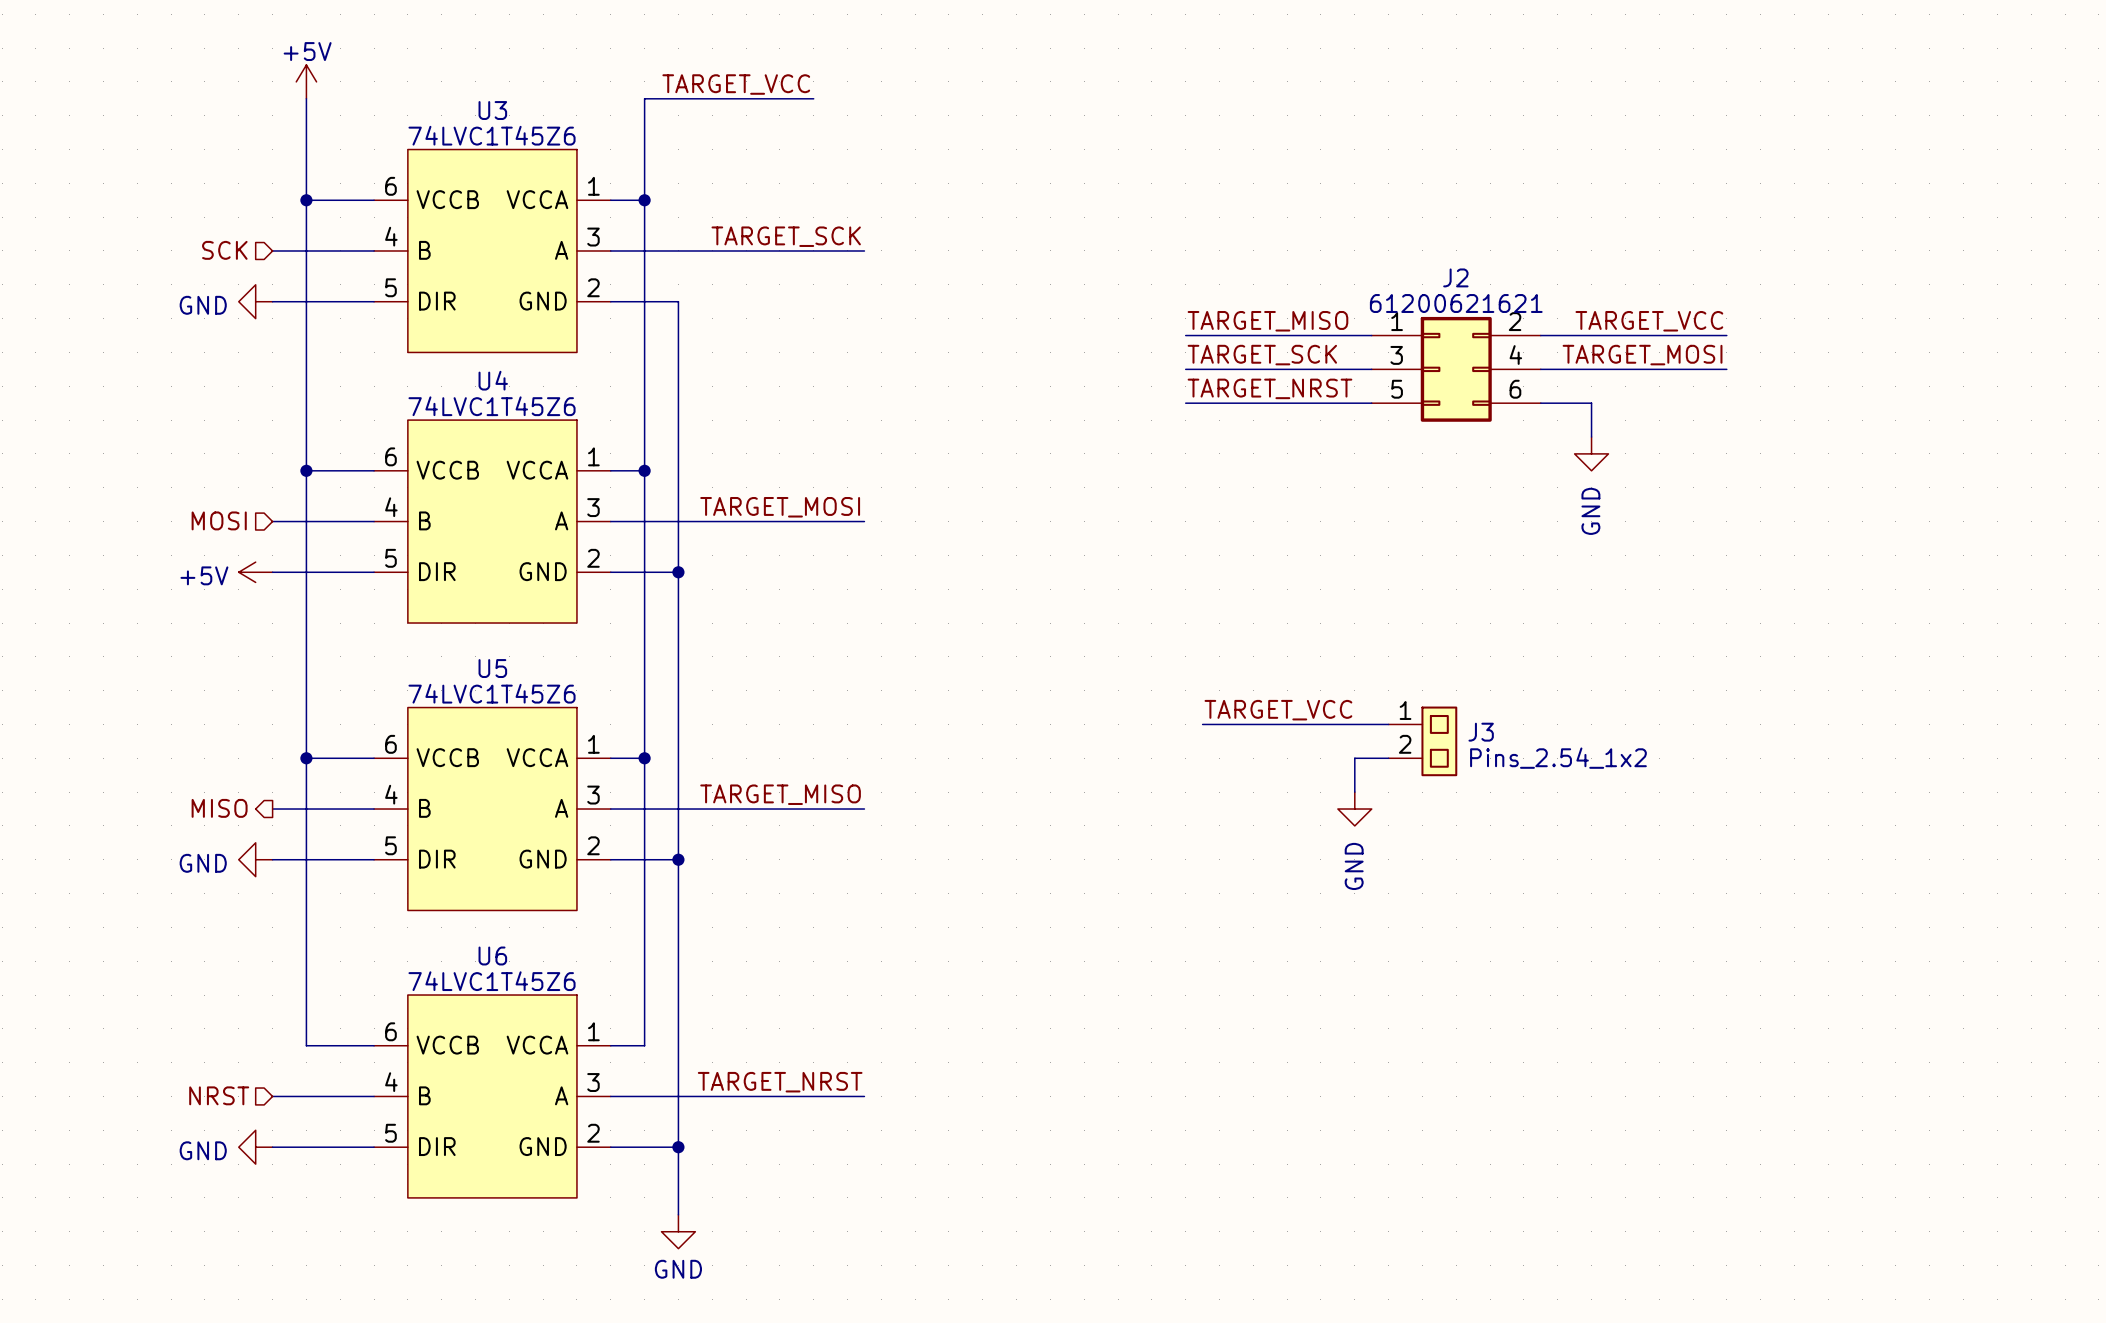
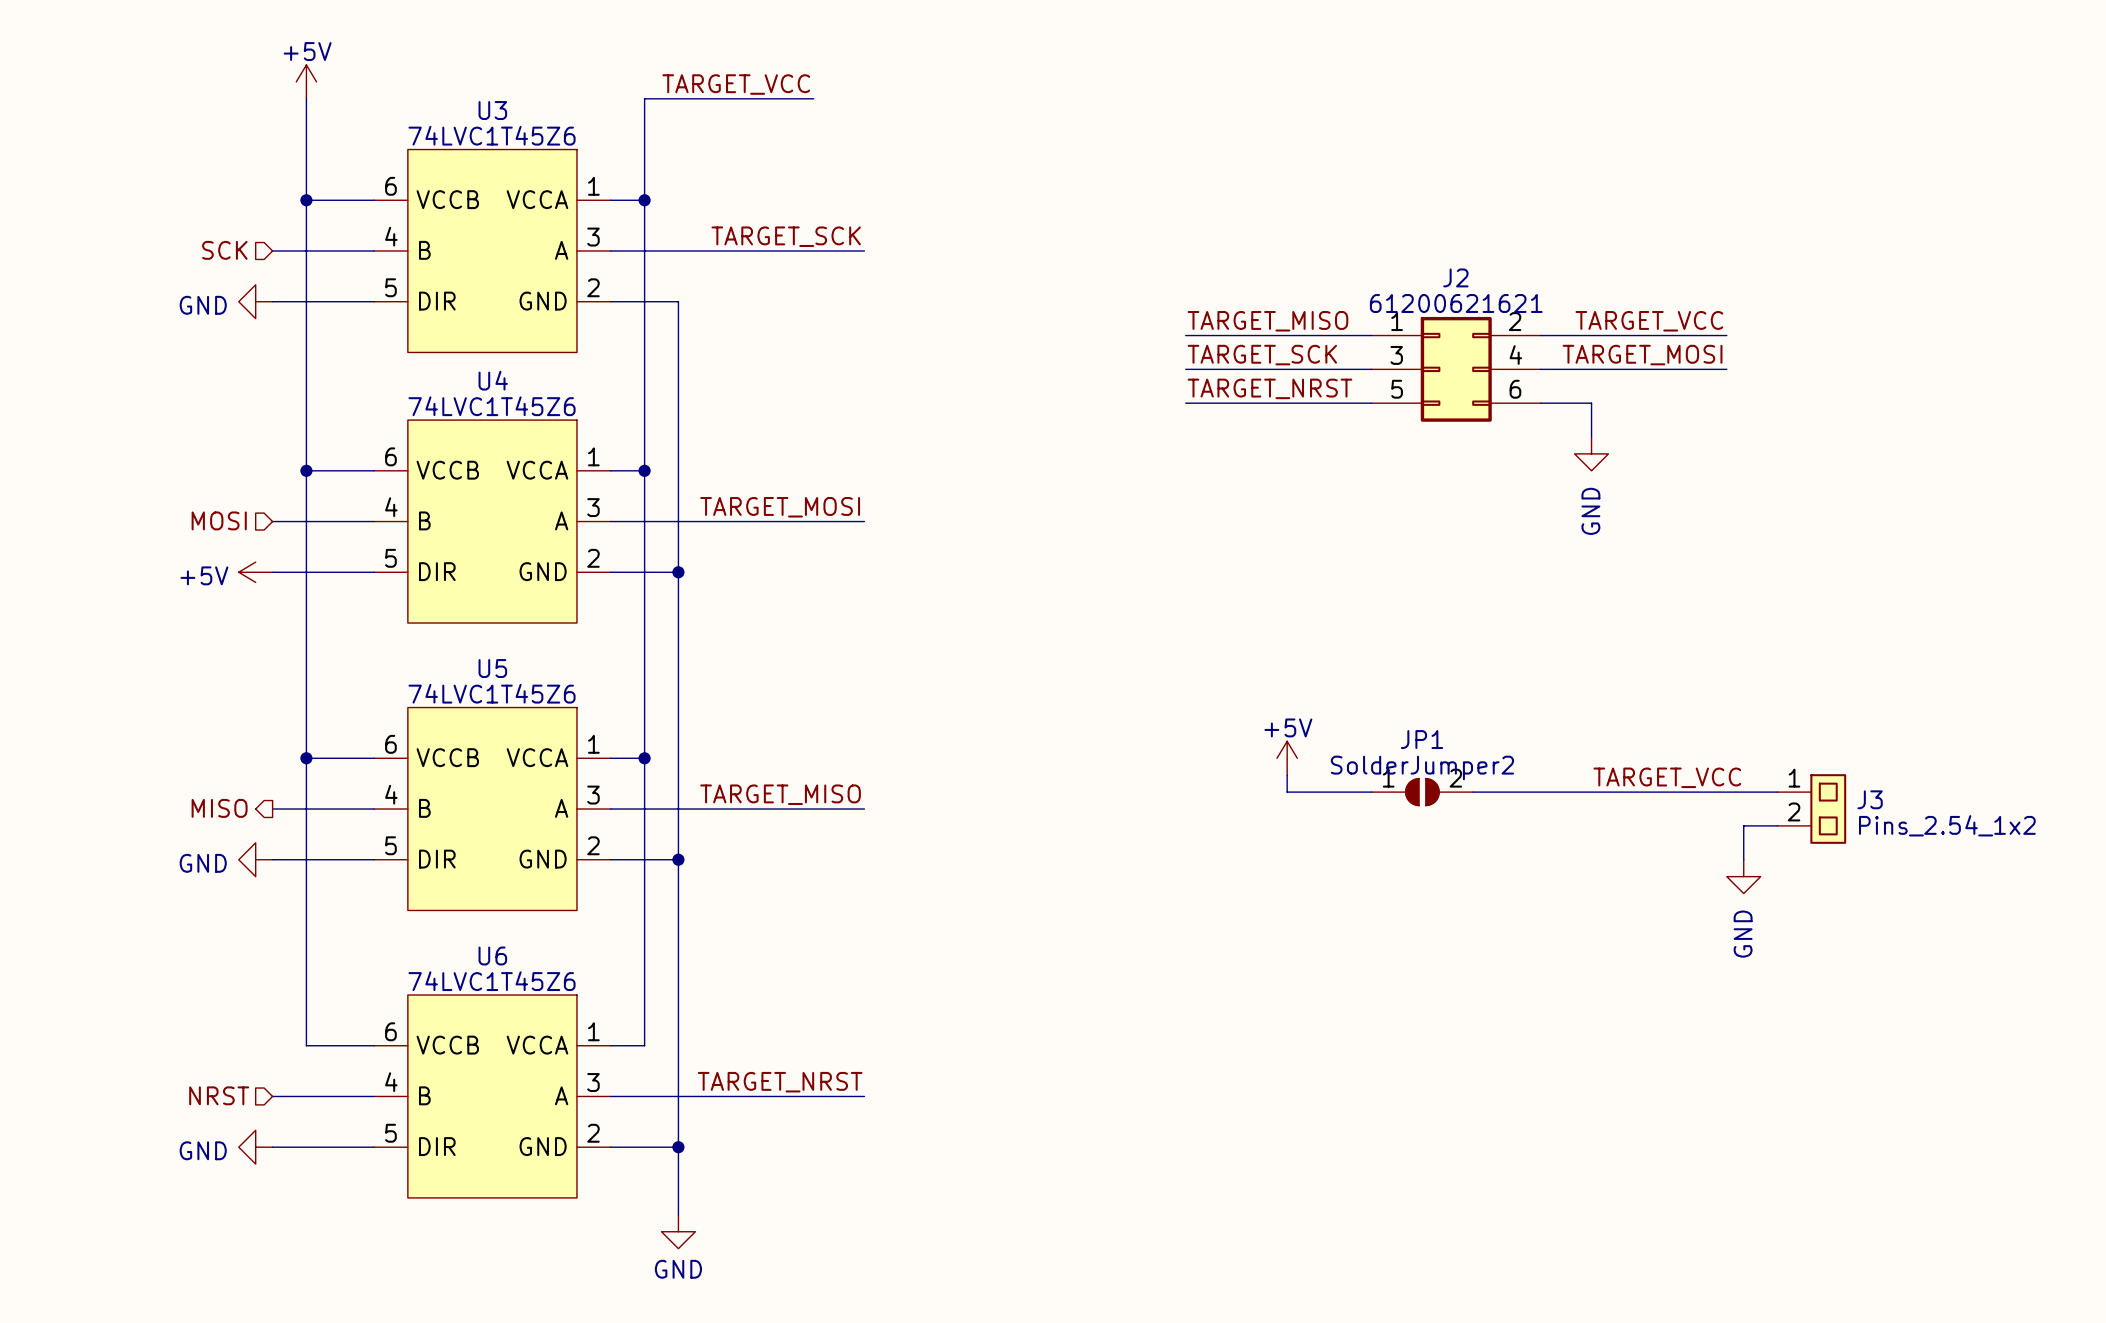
label: TARGET_VCC (1278, 710) -> none
wire: (1202, 724) (1388, 724) -> none
J3 position: (1422, 741) -> (1811, 809)
power symbol: none -> +5V (1287, 758)
wire: (1388, 758) (1354, 758) (1354, 792) -> none
wire: none -> (1287, 775) (1287, 792) (1371, 792)
label: none -> TARGET_VCC (1667, 777)
JP1: none -> SolderJumper2 (1422, 792)
wire: none -> (1473, 792) (1777, 792)
power symbol: GND (1354, 809) -> none
wire: none -> (1777, 825) (1743, 825) (1743, 859)
power symbol: none -> GND (1743, 876)

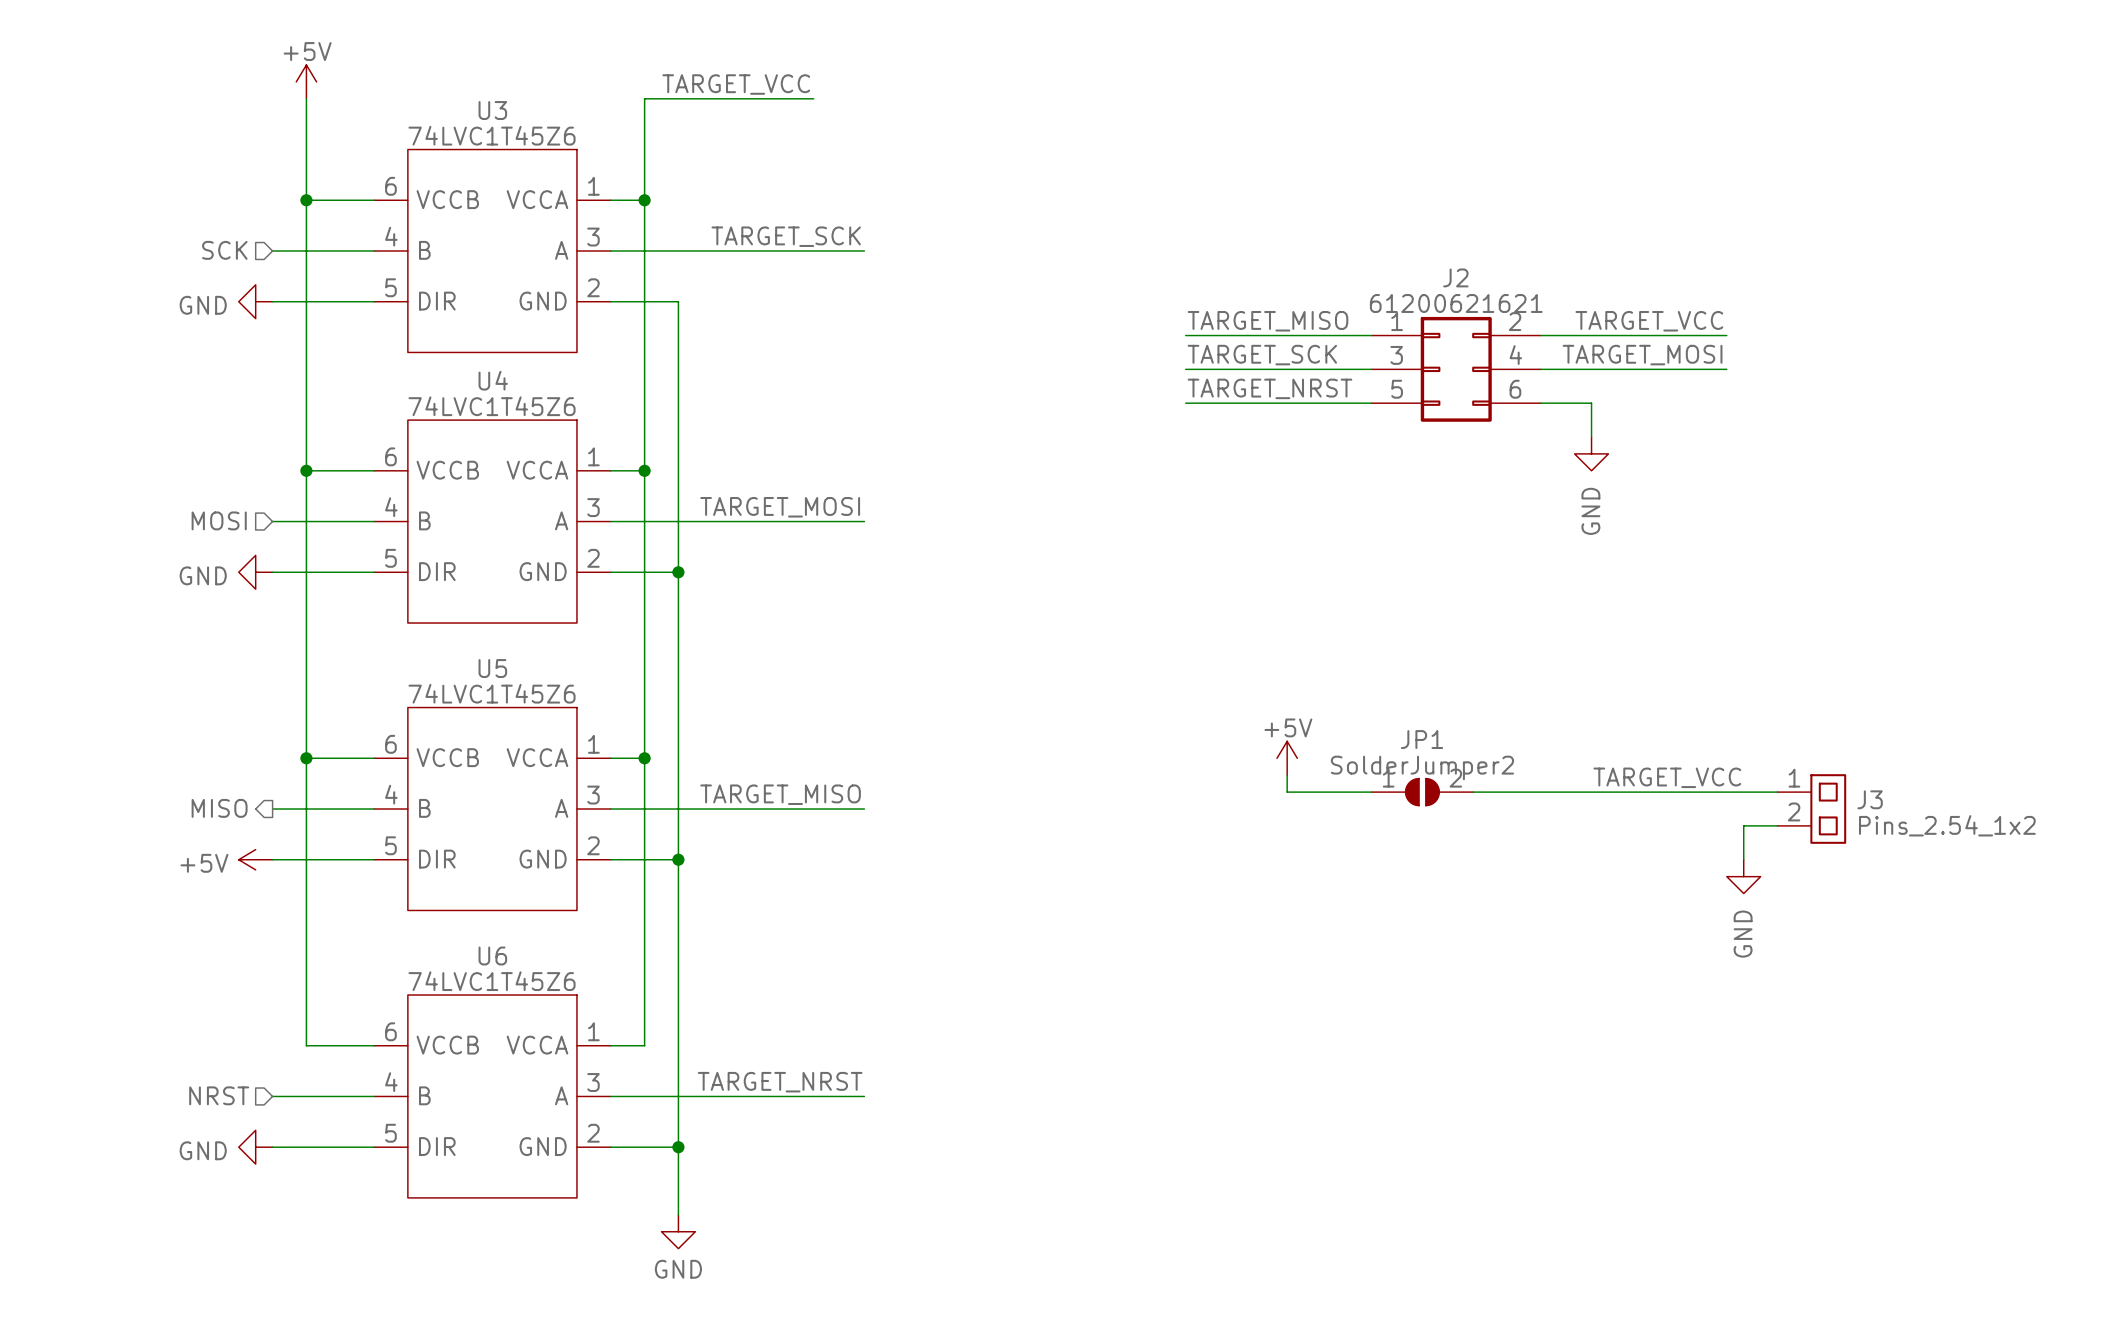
power symbol: +5V (255, 572) -> GND (255, 572)
power symbol: GND (255, 859) -> +5V (255, 859)

